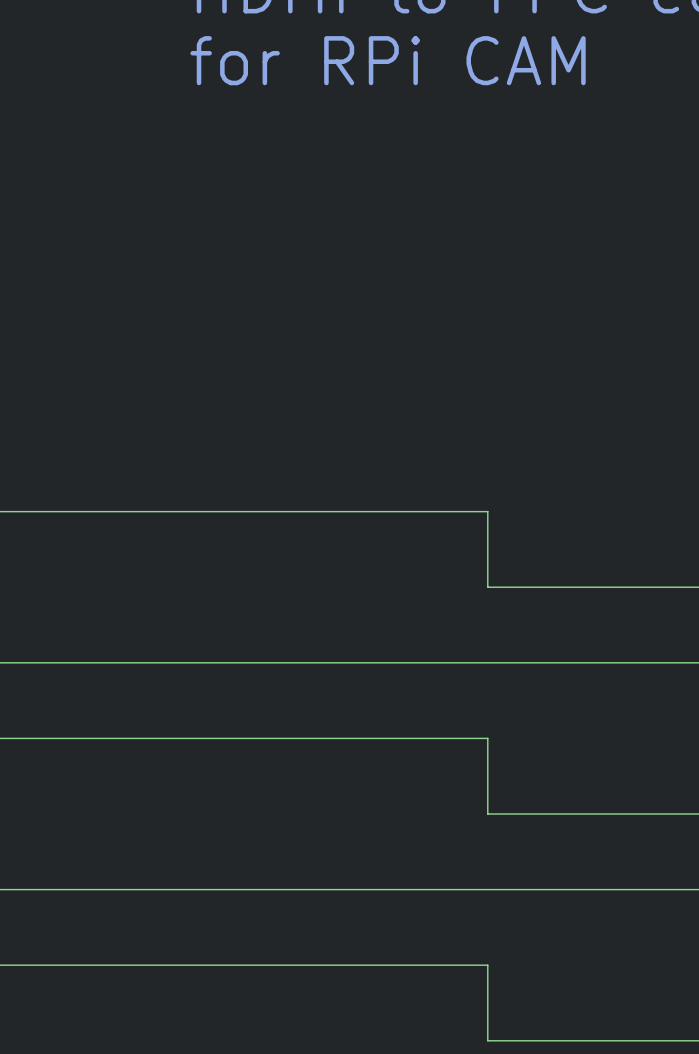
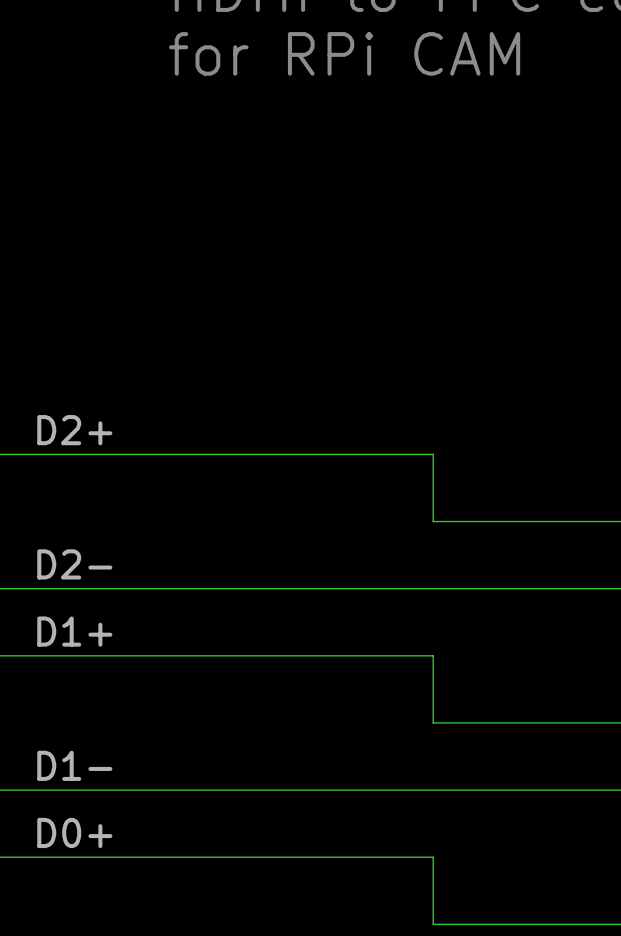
label: none -> D2+ (74, 430)
label: none -> D2- (74, 564)
label: none -> D1+ (74, 631)
label: none -> D1- (74, 765)
label: none -> D0+ (74, 832)

